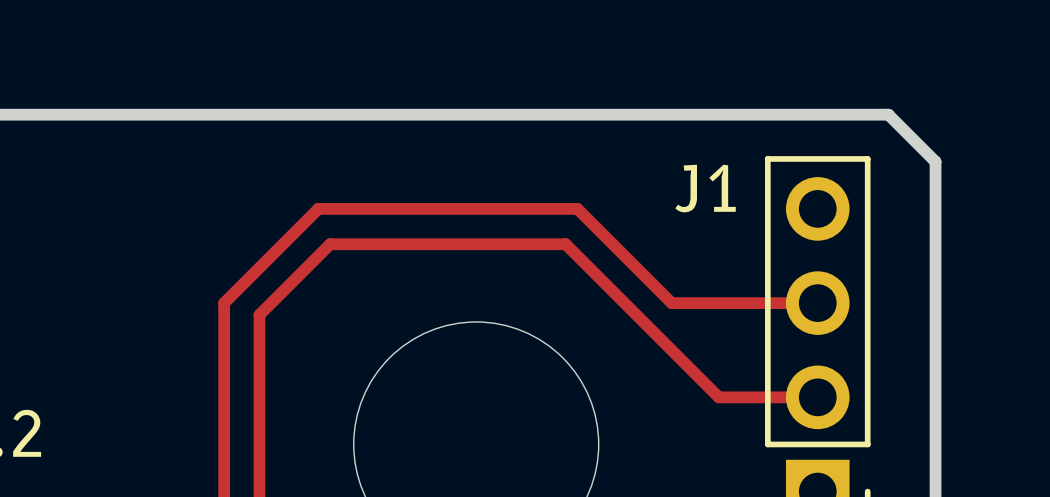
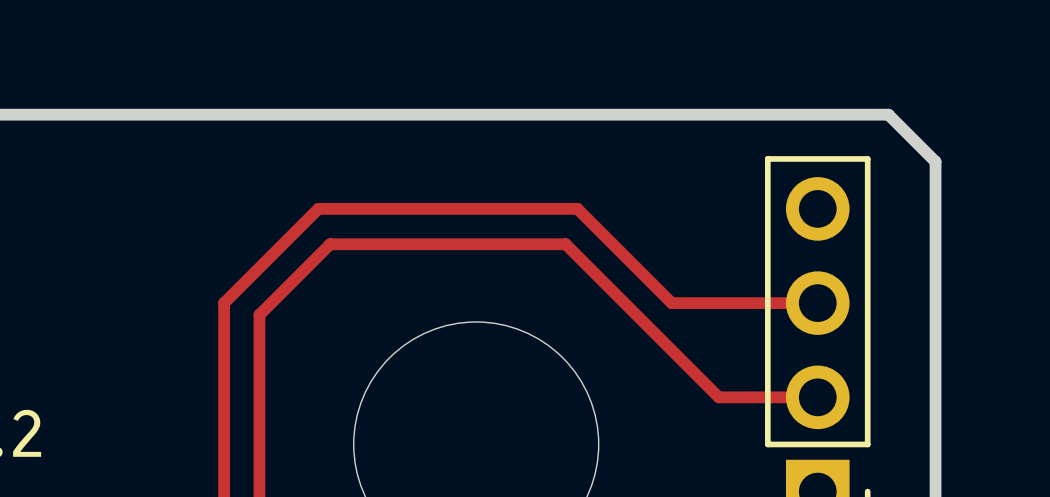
J1 name: J1 (705, 188) -> none

